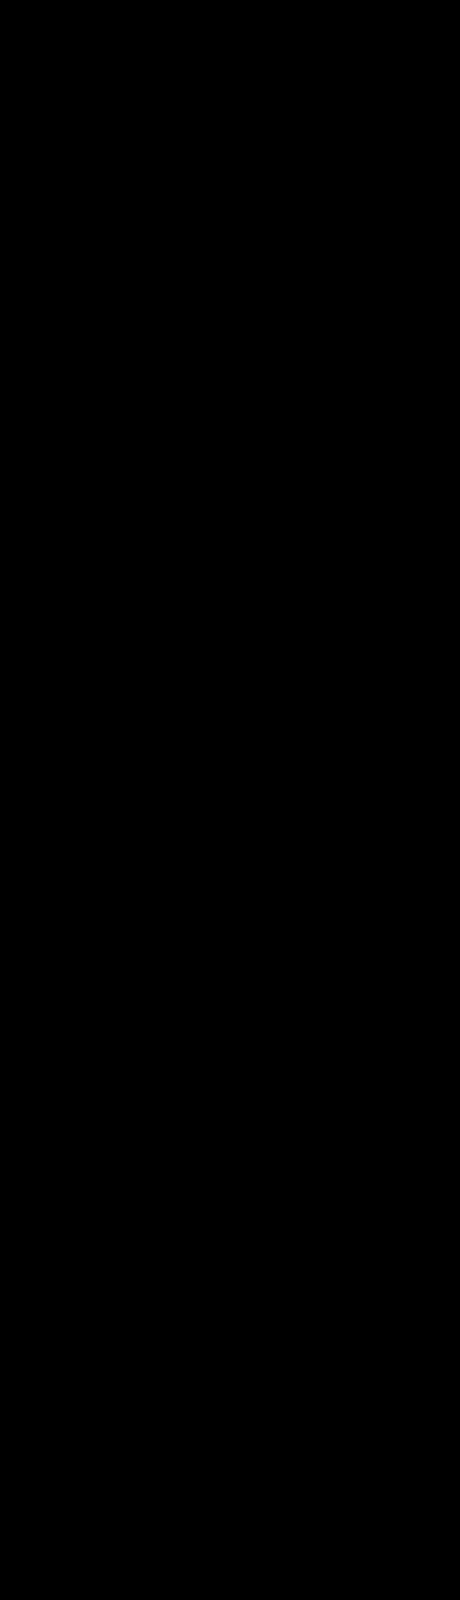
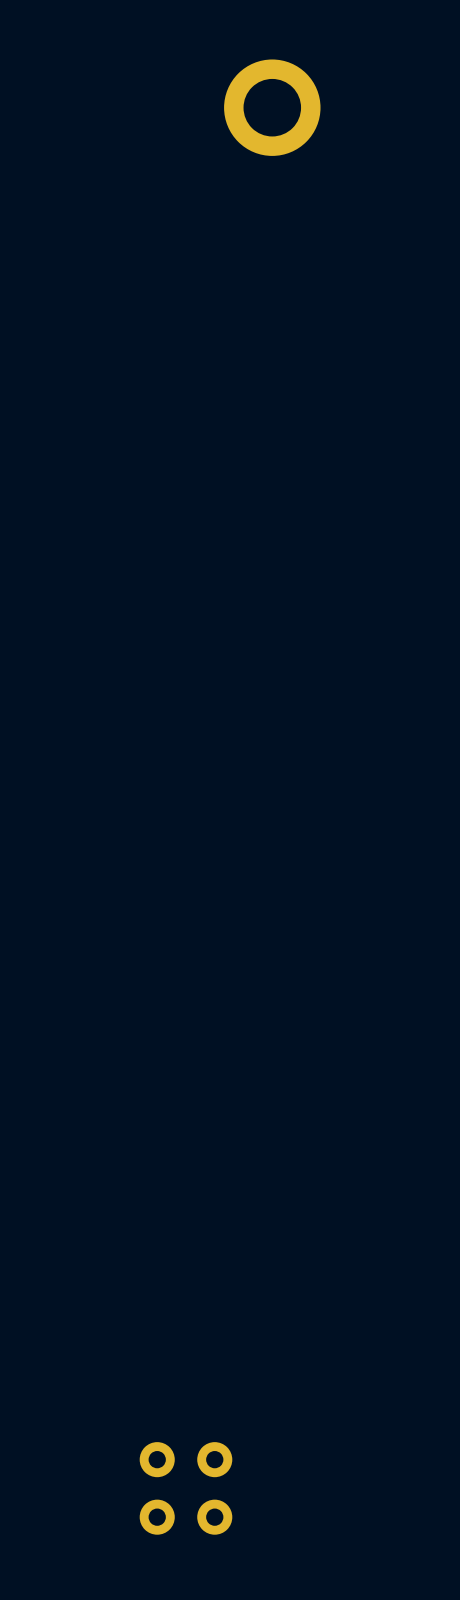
part: none -> (272, 107)
part: none -> (185, 1488)

